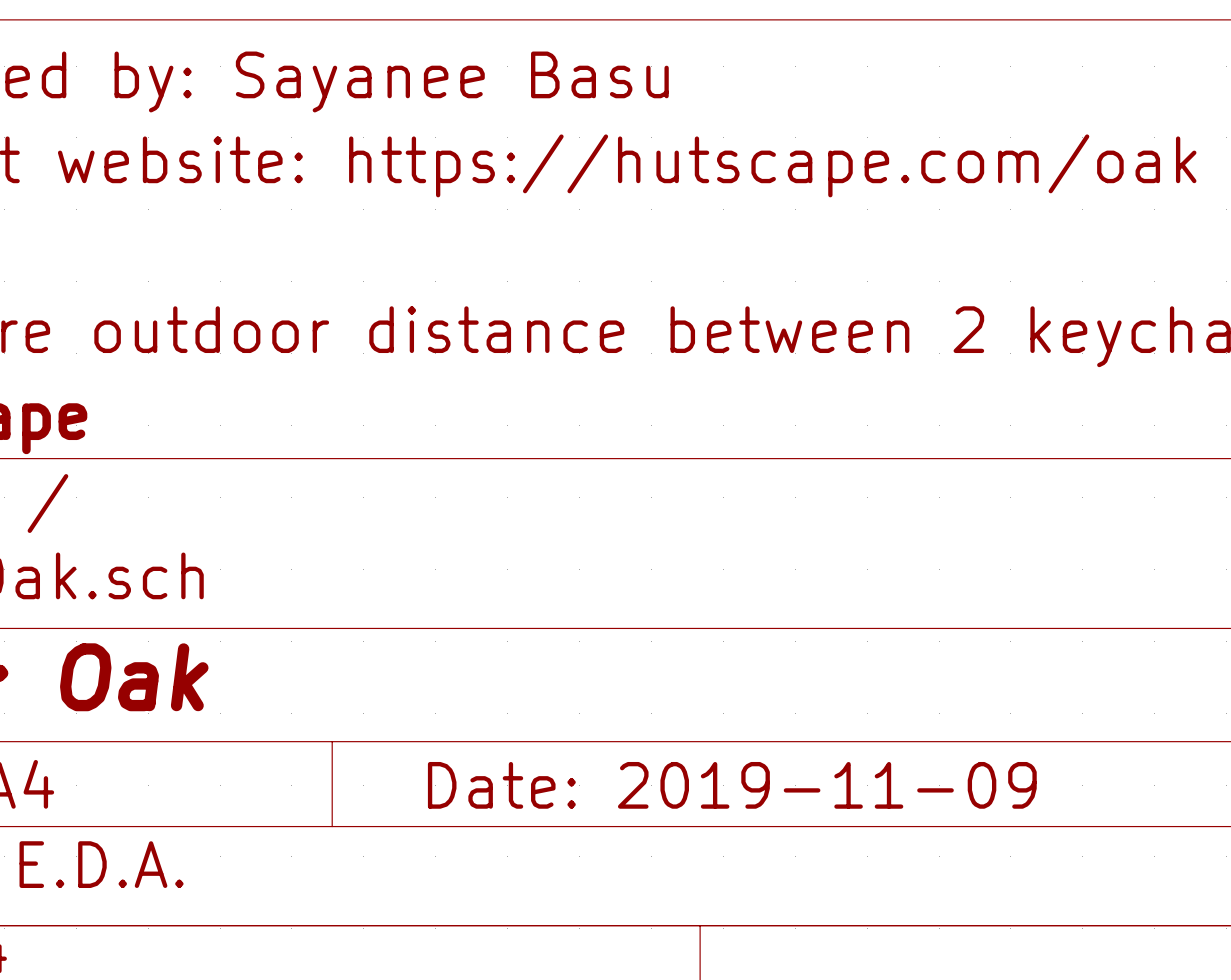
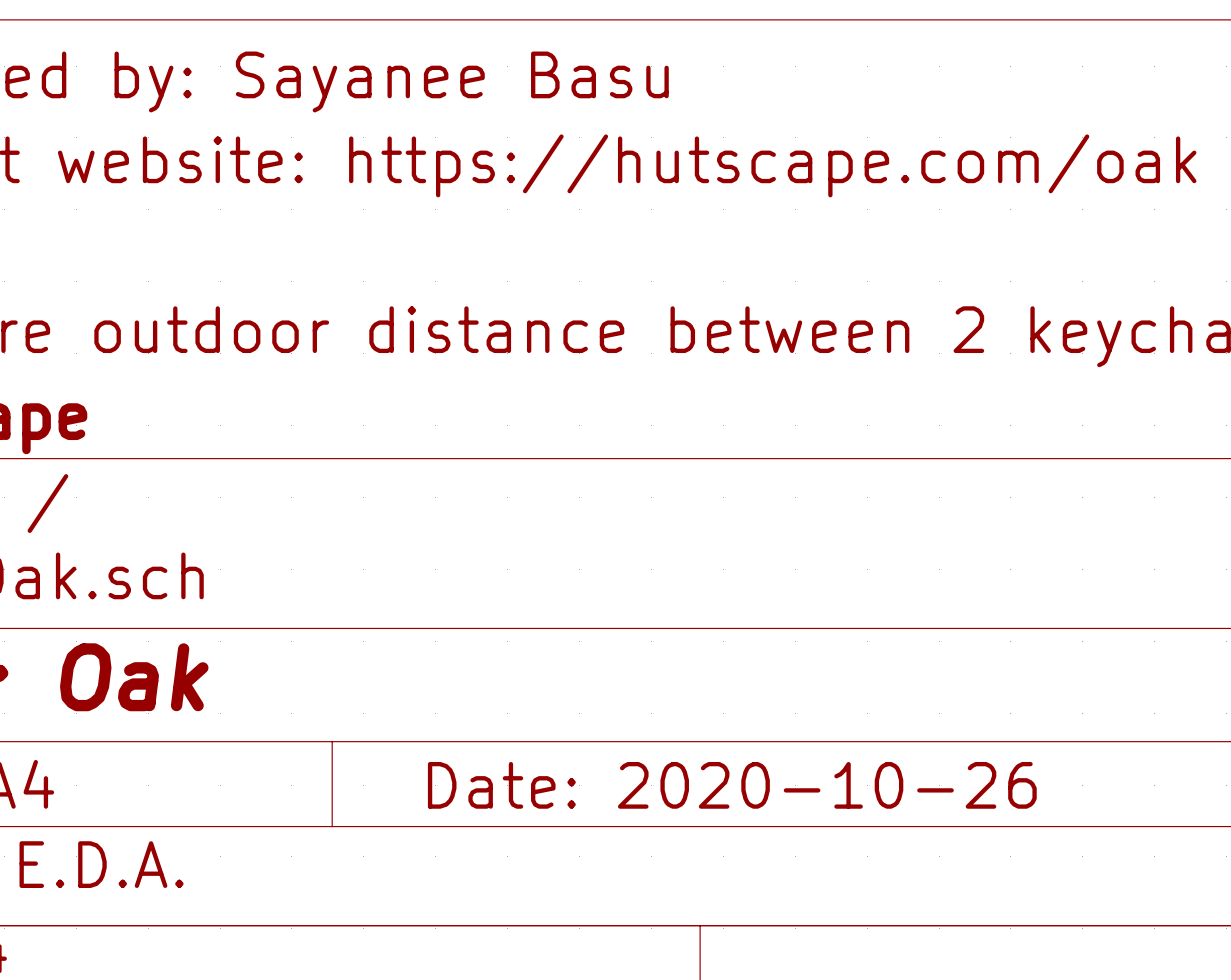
title block: Date: 2019-11-09 (732, 785) -> Date: 2020-10-26 (732, 785)

